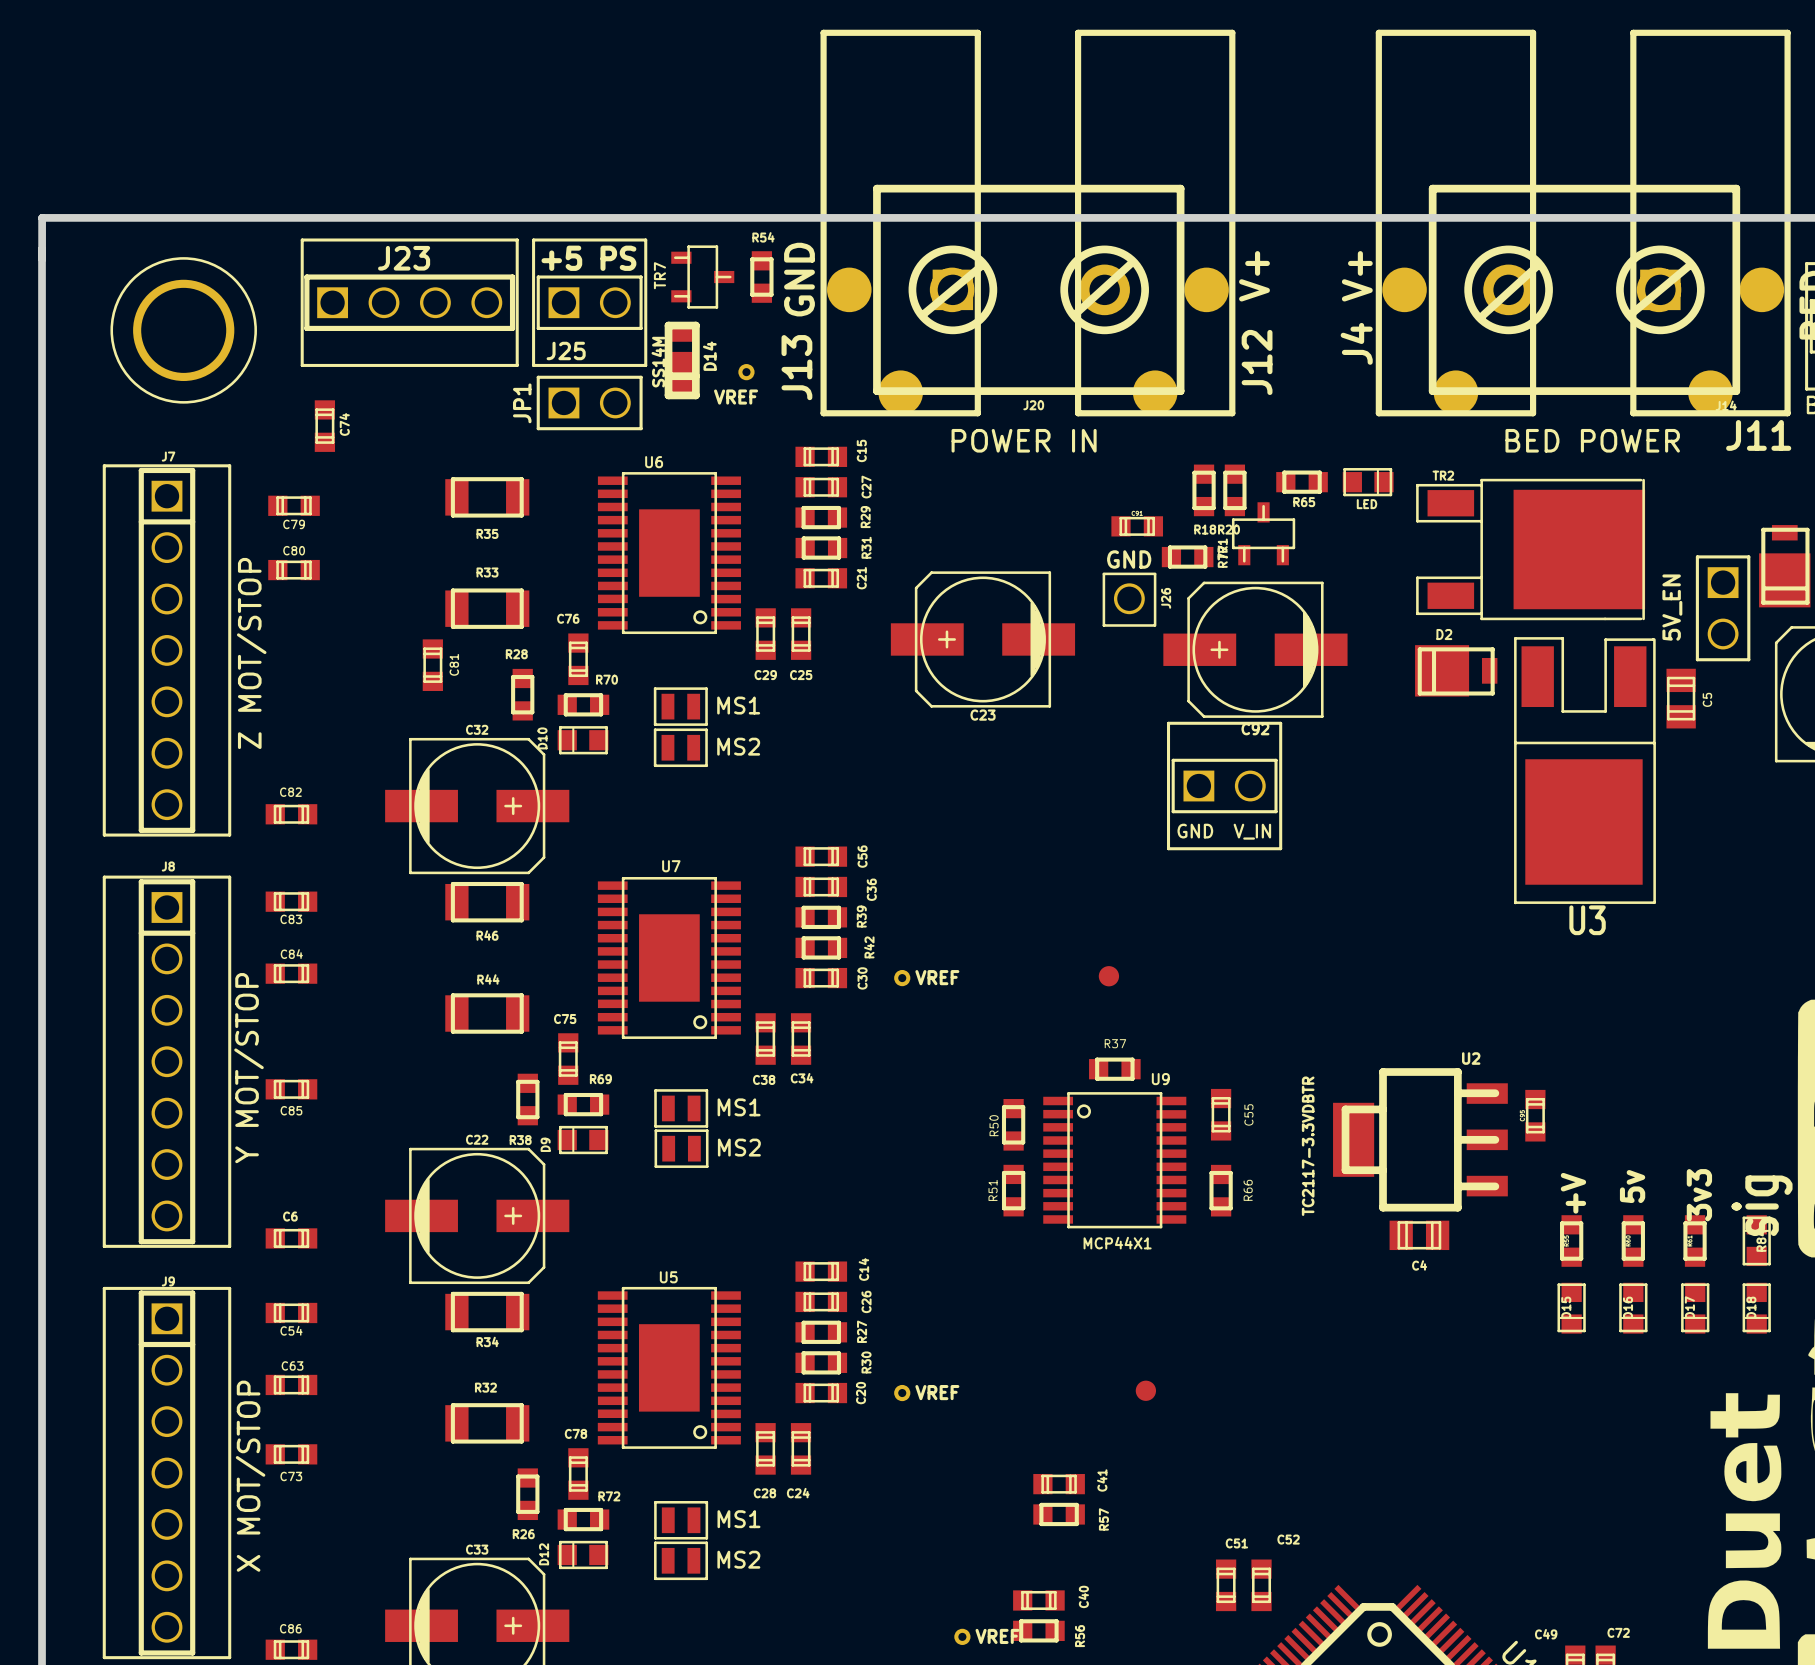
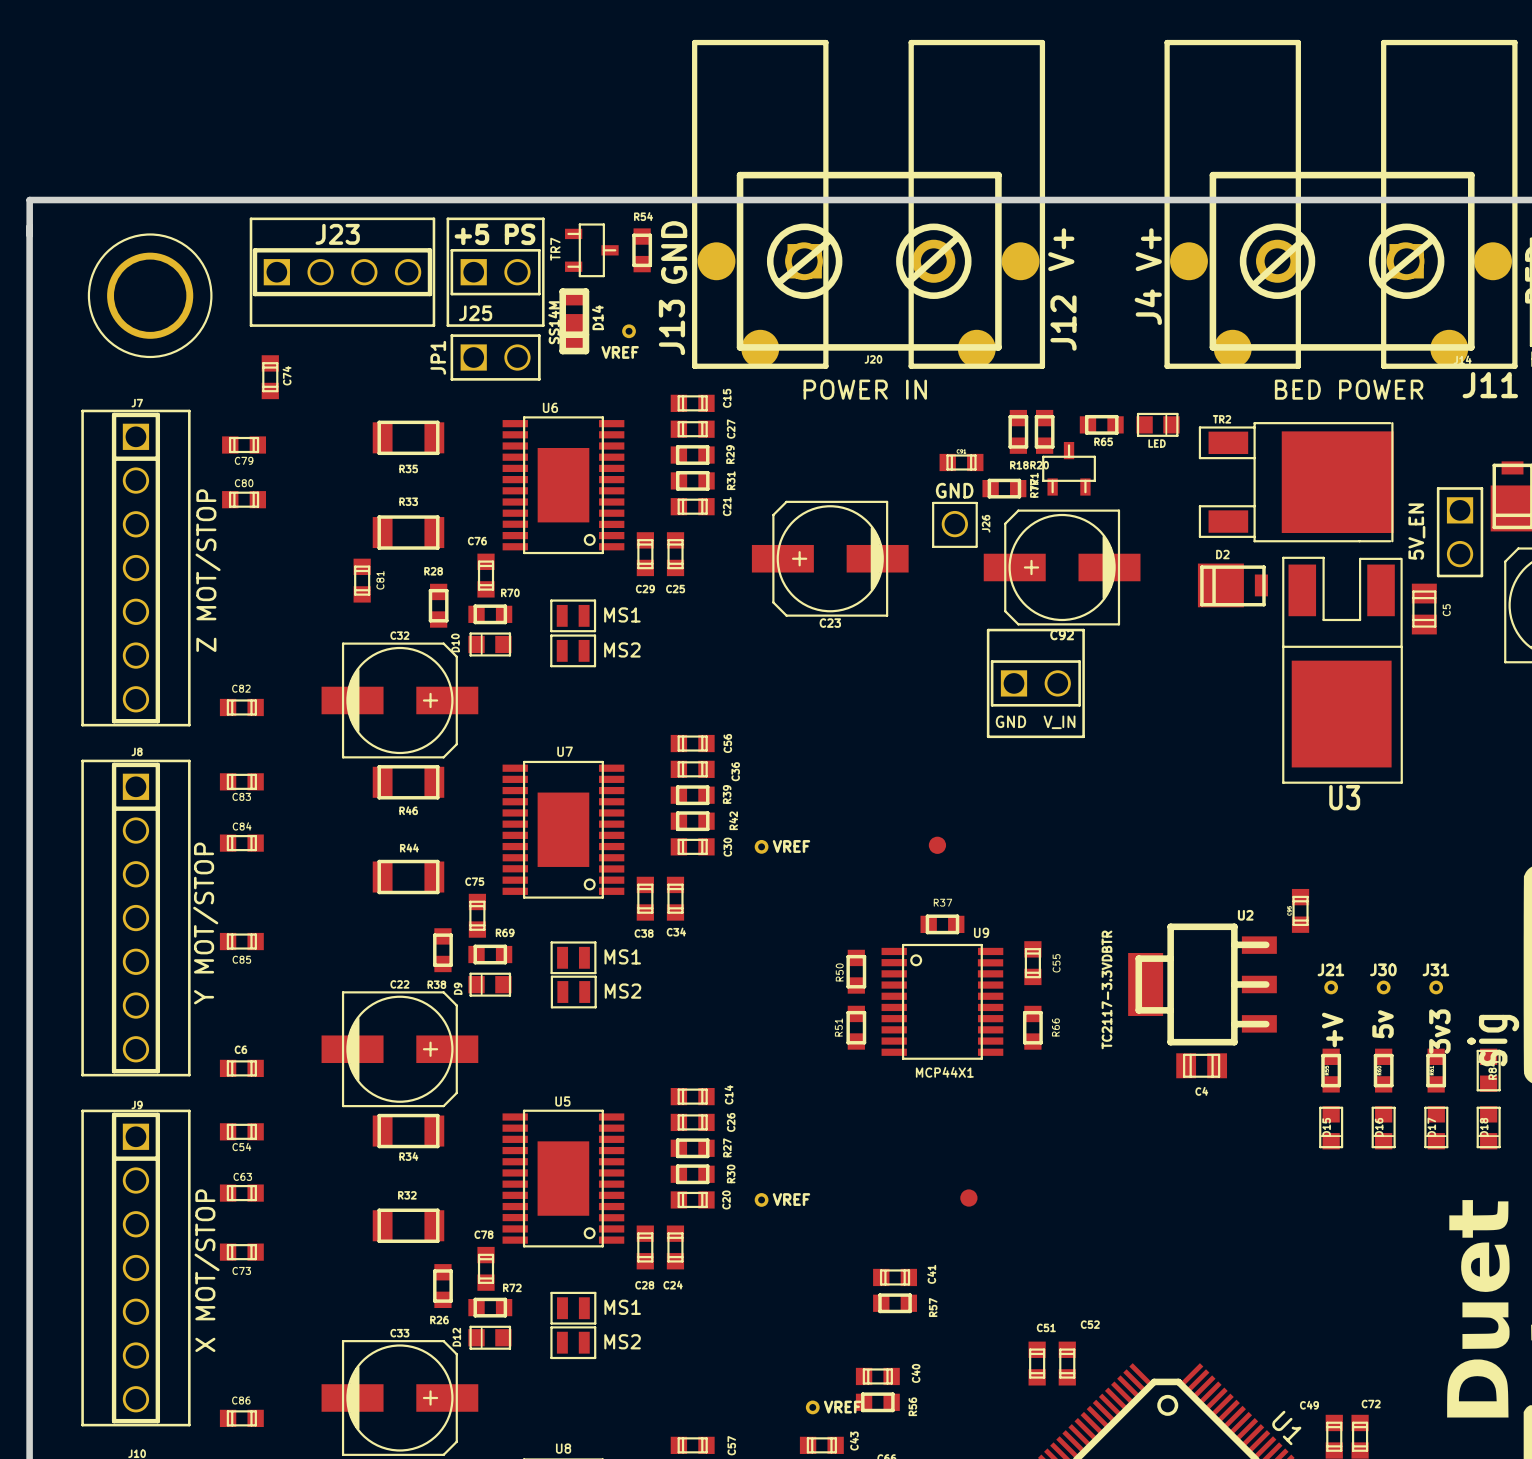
part position: (1535, 1115) -> (1300, 910)
J21: none -> (1331, 987)
J30: none -> (1383, 987)
J31: none -> (1436, 987)

